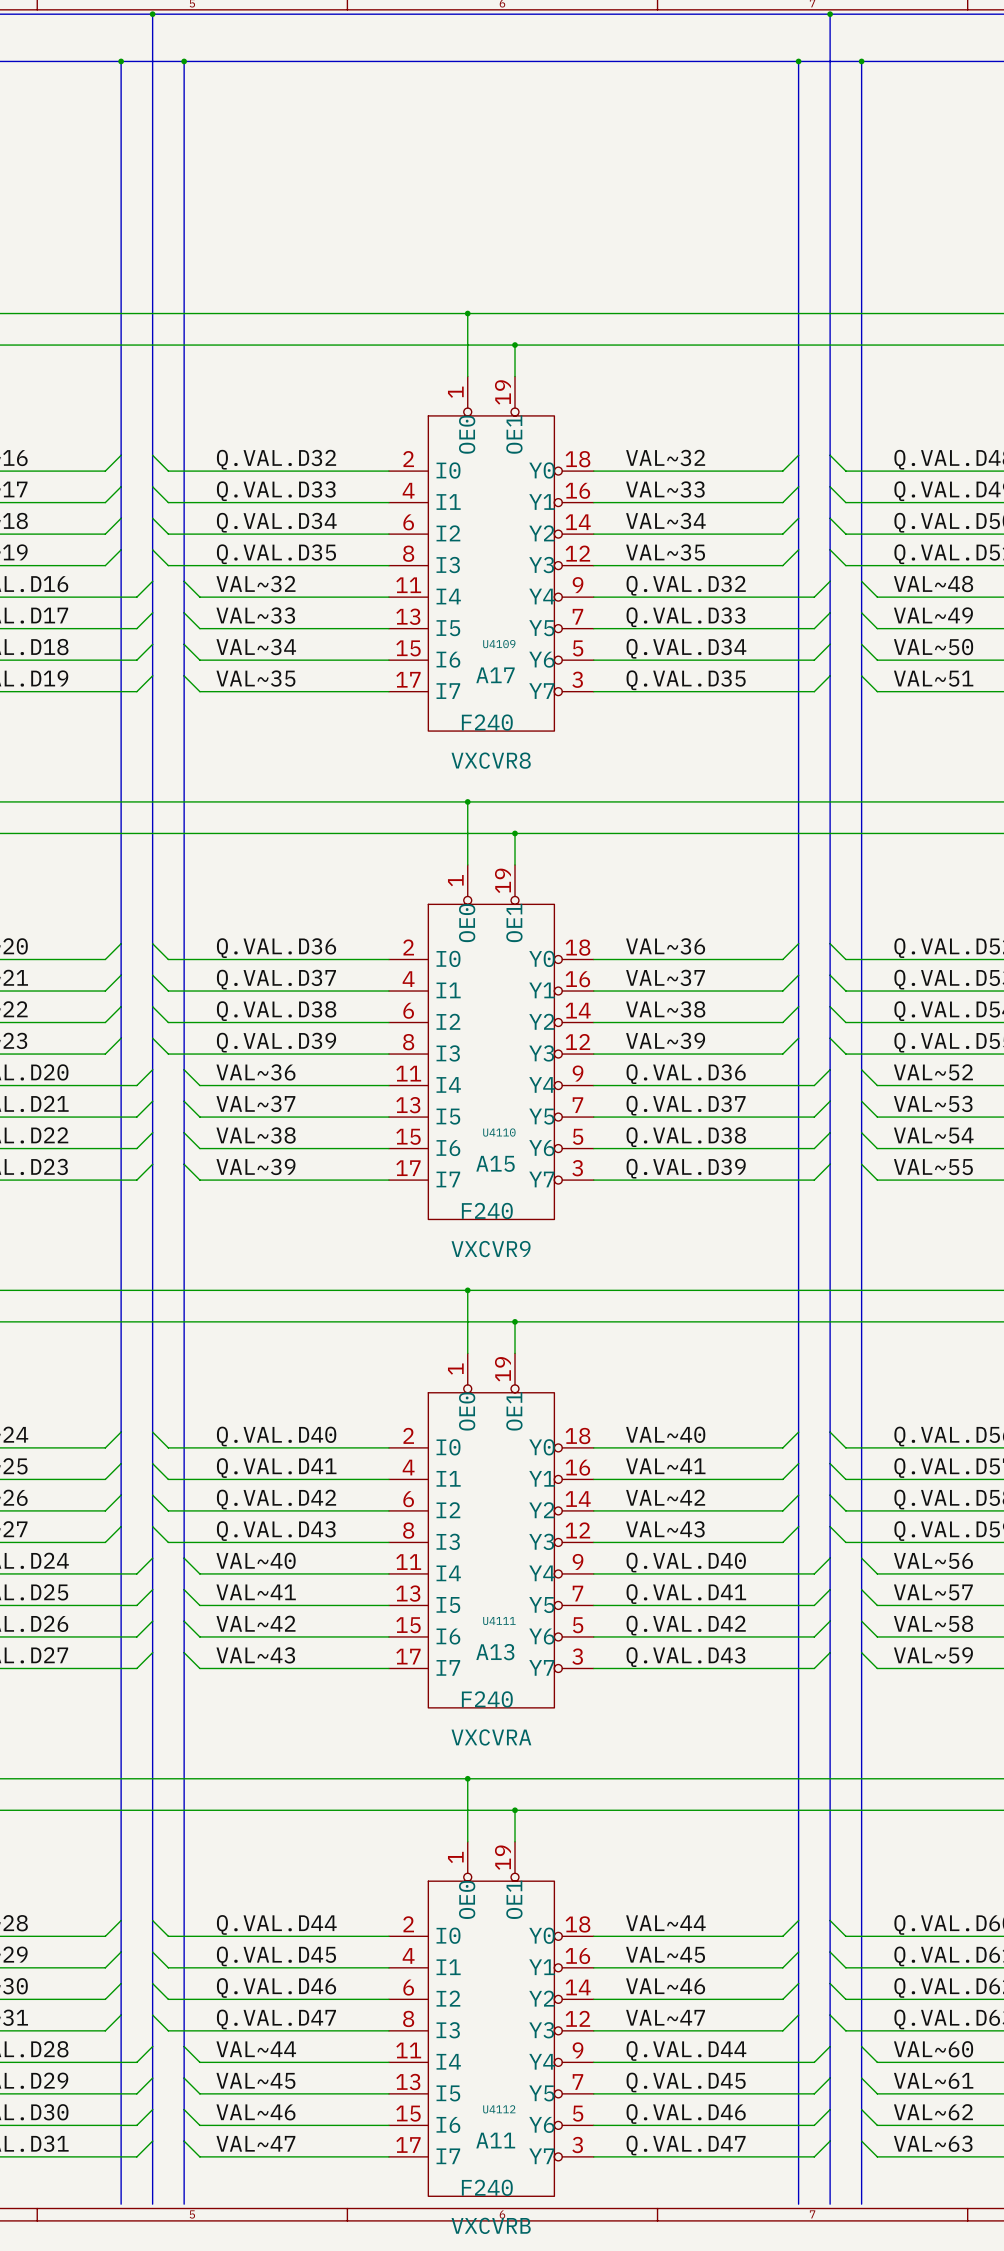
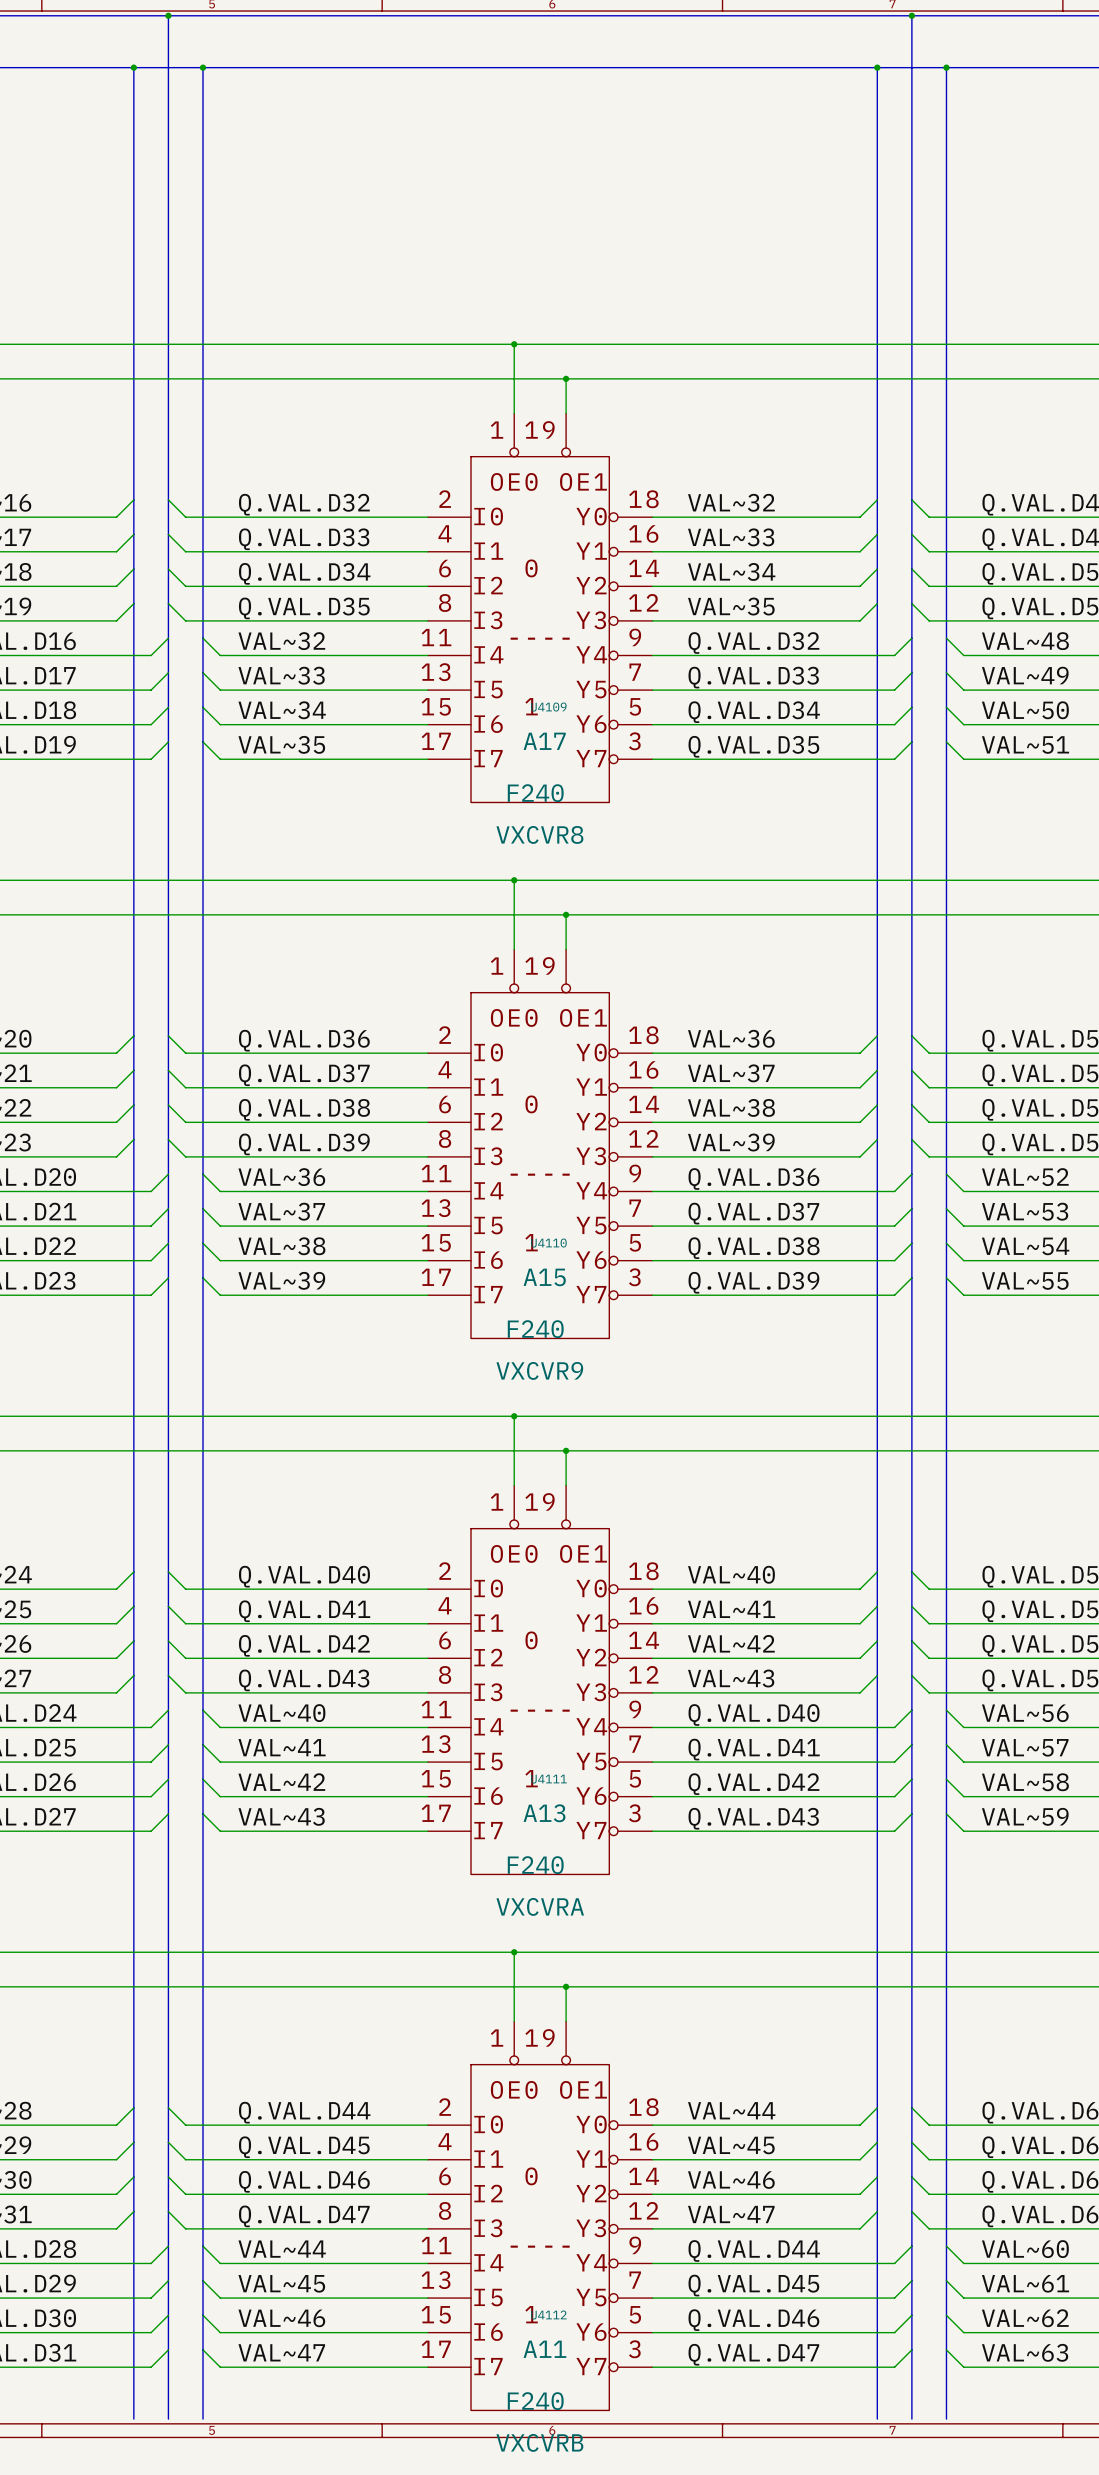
U4109 symbol: [388, 376, 594, 732] -> [427, 413, 653, 803]
U4110 symbol: [388, 864, 594, 1220] -> [427, 949, 653, 1339]
U4111 symbol: [388, 1353, 594, 1708] -> [427, 1485, 653, 1875]
U4112 symbol: [388, 1841, 594, 2197] -> [427, 2021, 653, 2411]

